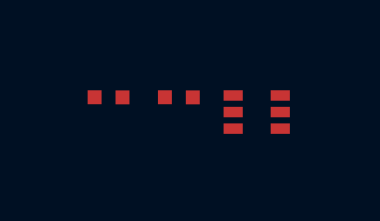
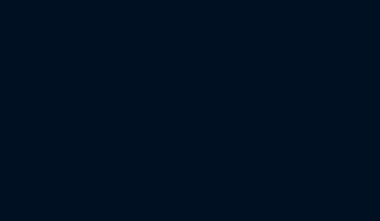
part: (108, 97) -> none
part: (178, 97) -> none
part: (256, 112) -> none

